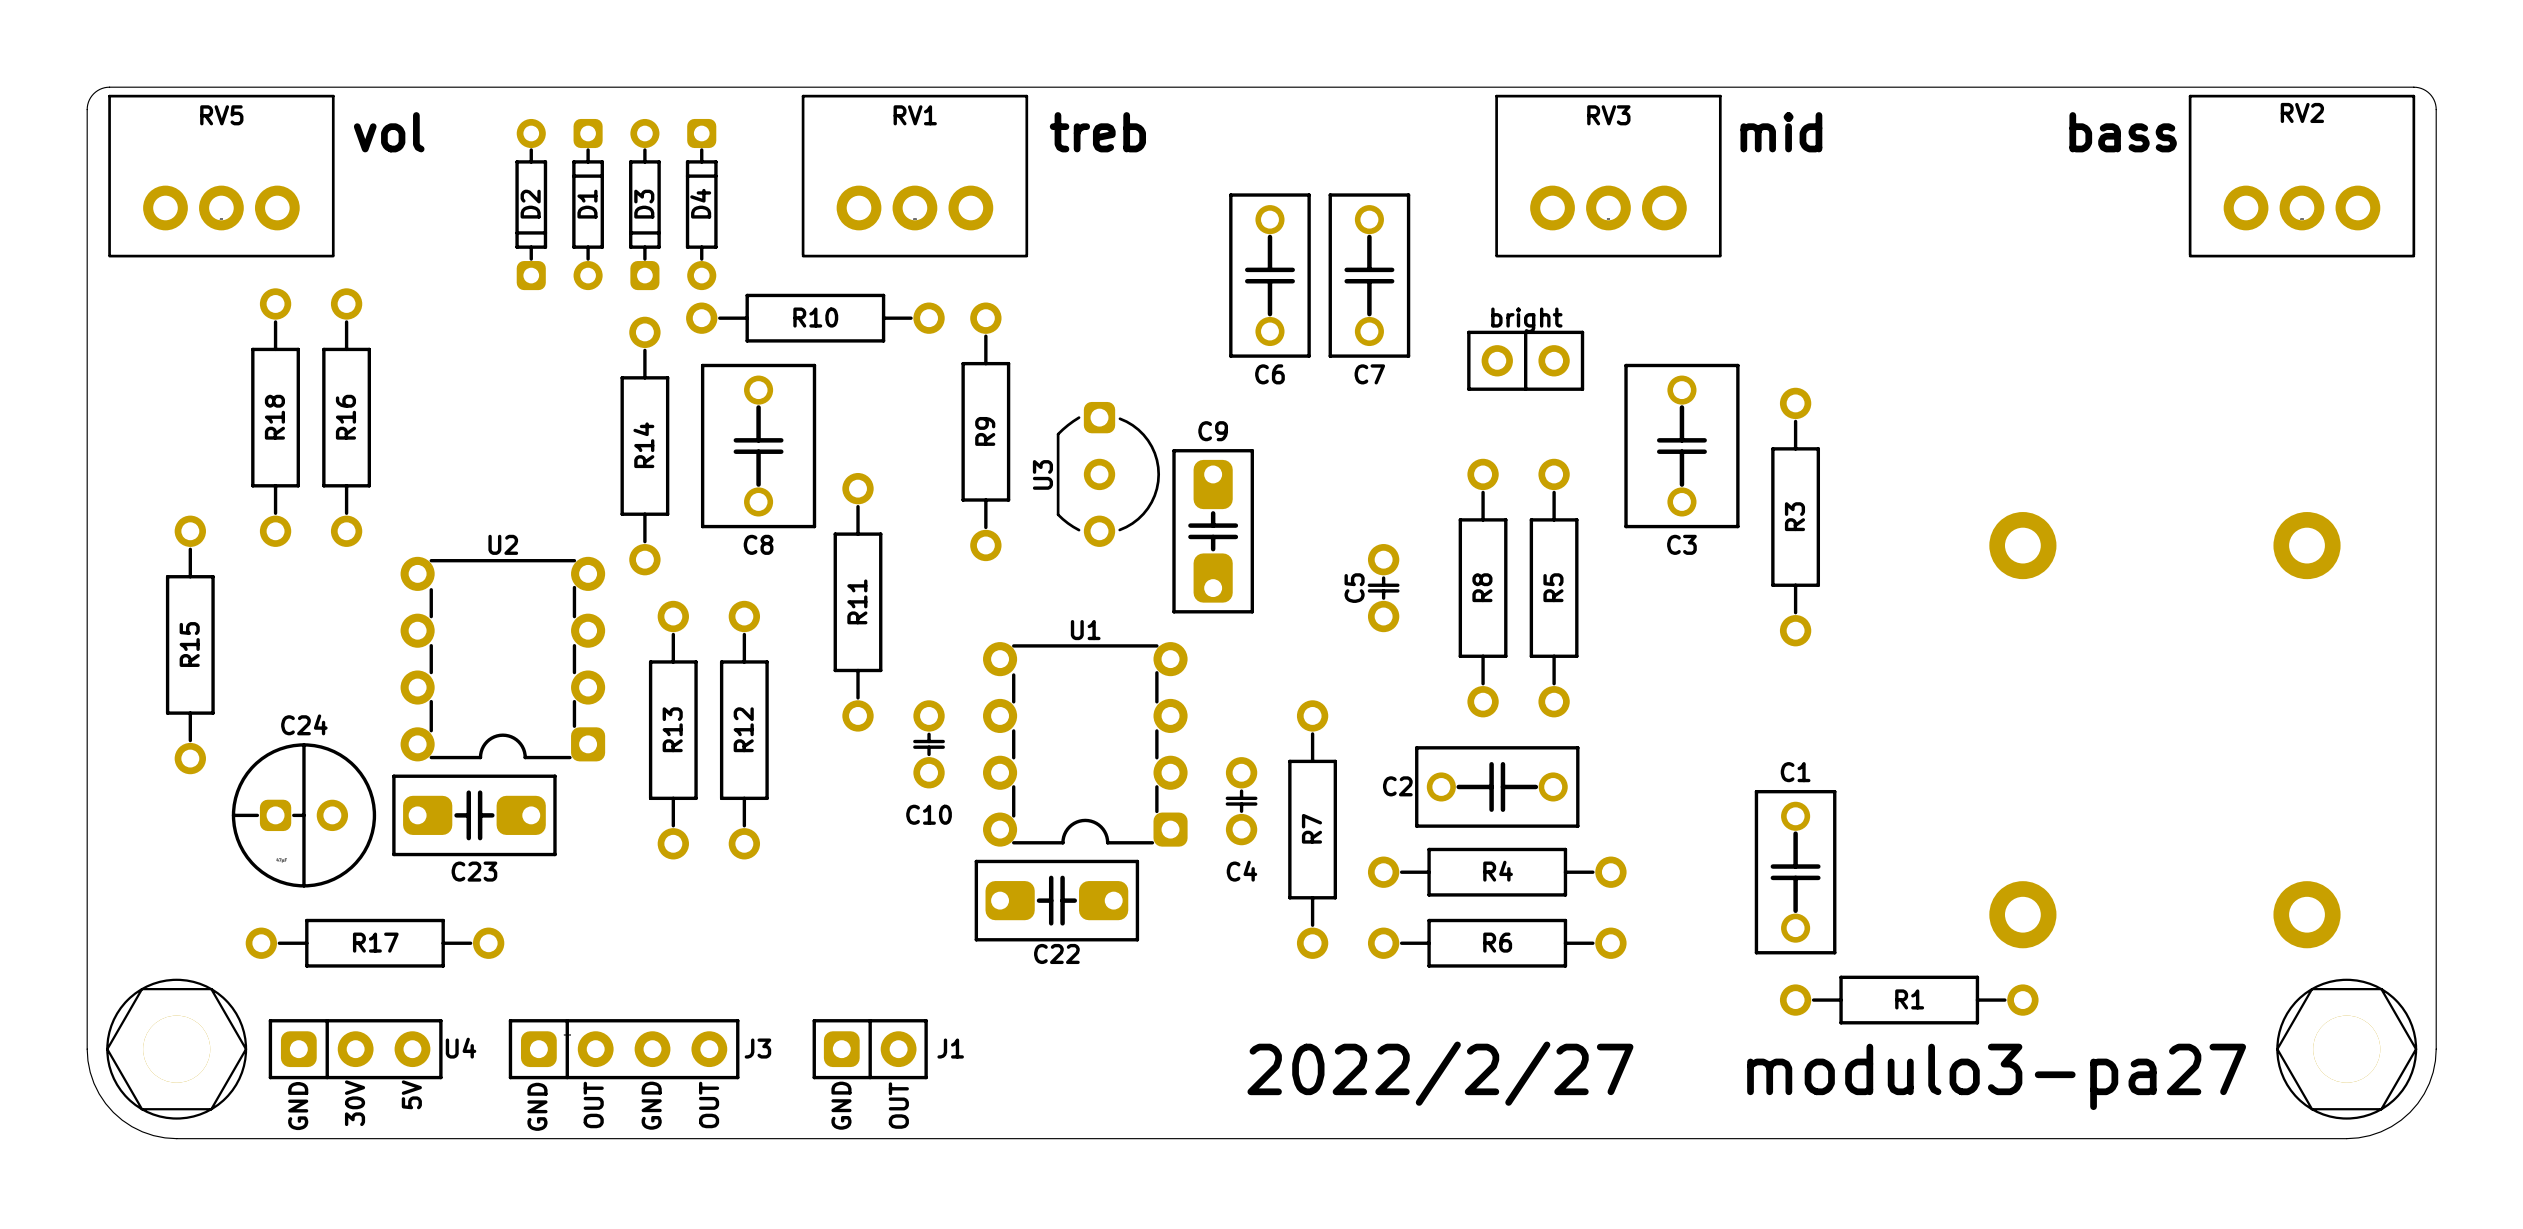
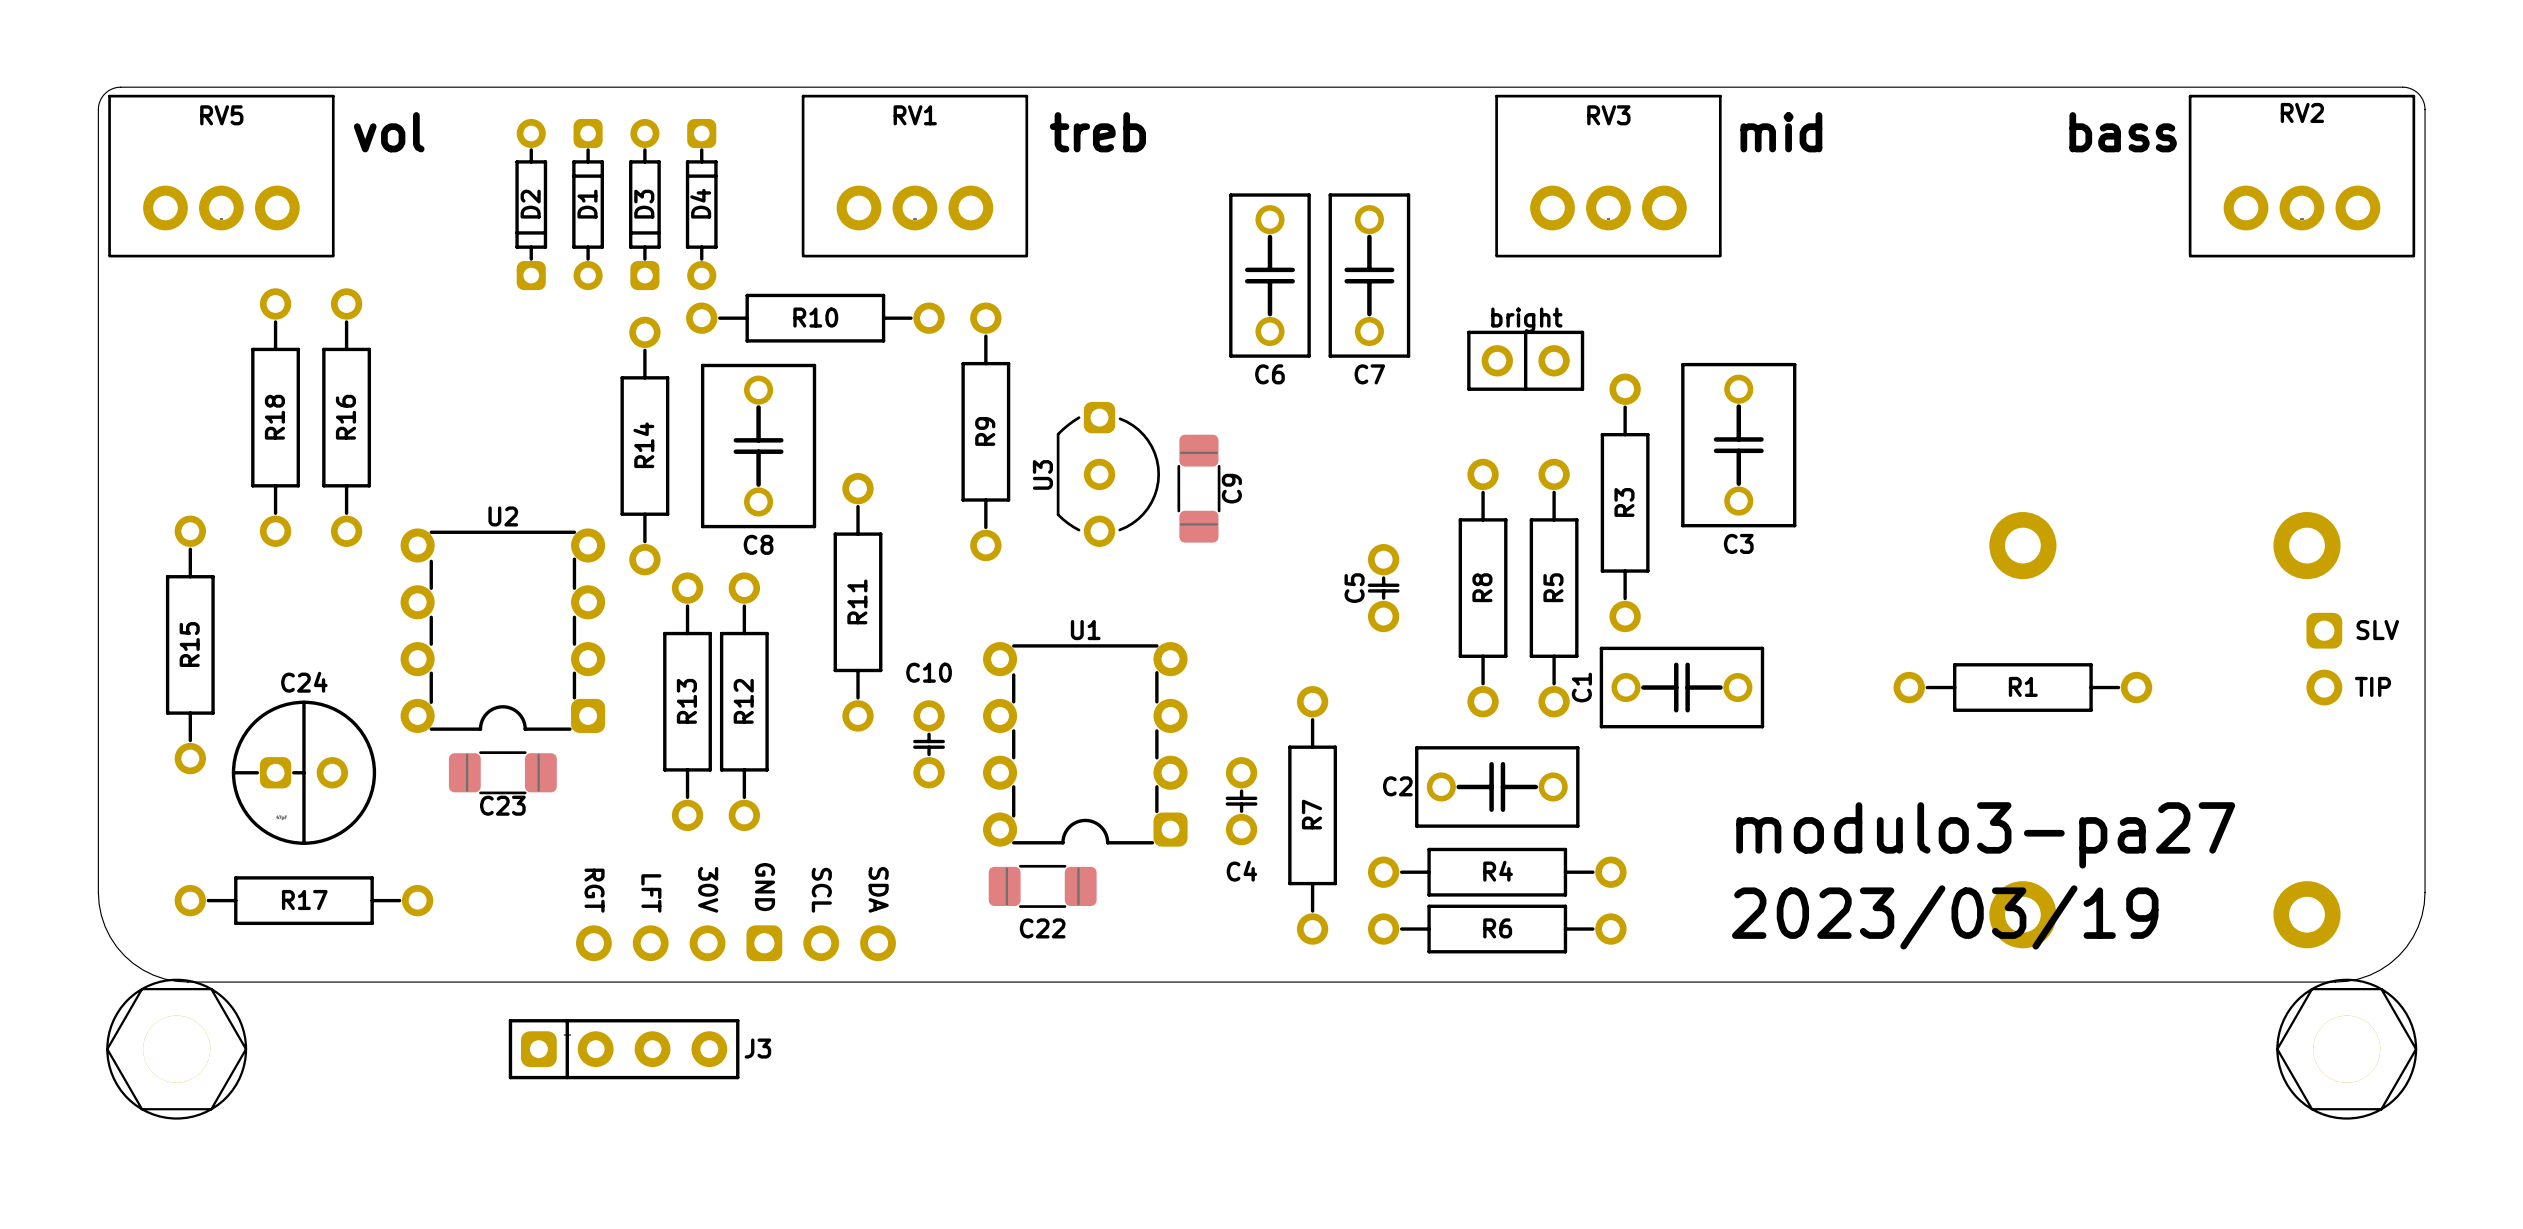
board edge: (120, 87) (107, 87) (97, 90) (90, 97) (87, 109) (87, 1049) (87, 1060) (94, 1083) (105, 1103) (113, 1112) (131, 1126) (142, 1131) (164, 1137) (176, 1138) (2346, 1138) (2358, 1137) (2380, 1131) (2391, 1126) (2410, 1112) (2424, 1093) (2433, 1072) (2436, 1049) (2436, 109) (2433, 99) (2425, 90) (2416, 87) (2402, 87) -> (120, 87) (111, 89) (104, 93) (100, 99) (98, 109) (99, 904) (105, 926) (110, 937) (124, 955) (133, 963) (153, 975) (164, 979) (187, 982) (2335, 982) (2358, 979) (2369, 975) (2390, 963) (2406, 947) (2413, 937) (2421, 915) (2425, 892) (2425, 109) (2422, 99) (2418, 93) (2410, 88) (2402, 87)
C9 name position: C9 (1213, 431) -> C9 (1231, 488)
C3 position: (1681, 446) -> (1738, 445)
C9 footprint: [1172, 449, 1254, 614] -> [1177, 434, 1221, 543]
R3 position: (1795, 517) -> (1625, 502)
U2 position: (502, 659) -> (502, 630)
part: none -> (2324, 659)
R13 position: (673, 730) -> (687, 701)
R12 position: (744, 730) -> (744, 701)
C1 name position: C1 (1795, 772) -> C1 (1581, 687)
C23 footprint: [392, 774, 557, 857] -> [448, 751, 557, 795]
C10 name position: C10 (929, 814) -> C10 (929, 672)
C24 position: (303, 815) -> (303, 772)
R7 position: (1312, 829) -> (1312, 815)
C22 footprint: [974, 859, 1140, 942] -> [988, 864, 1097, 908]
C1 rotation: 0° (1795, 872) -> 90° clockwise (1681, 687)
C1 position: (1795, 872) -> (1681, 687)
text: none -> 2023/03/19 (1945, 917)
R17 position: (375, 943) -> (303, 900)
part: none -> (735, 943)
R6 position: (1497, 943) -> (1497, 929)
R1 position: (1909, 1000) -> (2022, 687)
U4: (355, 1049) -> none
J1: (870, 1049) -> none
text: 2022/2/27 (1440, 1073) -> none
text position: modulo3-pa27 (1996, 1076) -> modulo3-pa27 (1985, 835)
text: OUT (593, 1104) -> none
text: OUT (709, 1104) -> none
text: GND (651, 1105) -> none
text: GND (841, 1105) -> none
text: OUT (898, 1105) -> none
text: GND (537, 1106) -> none

